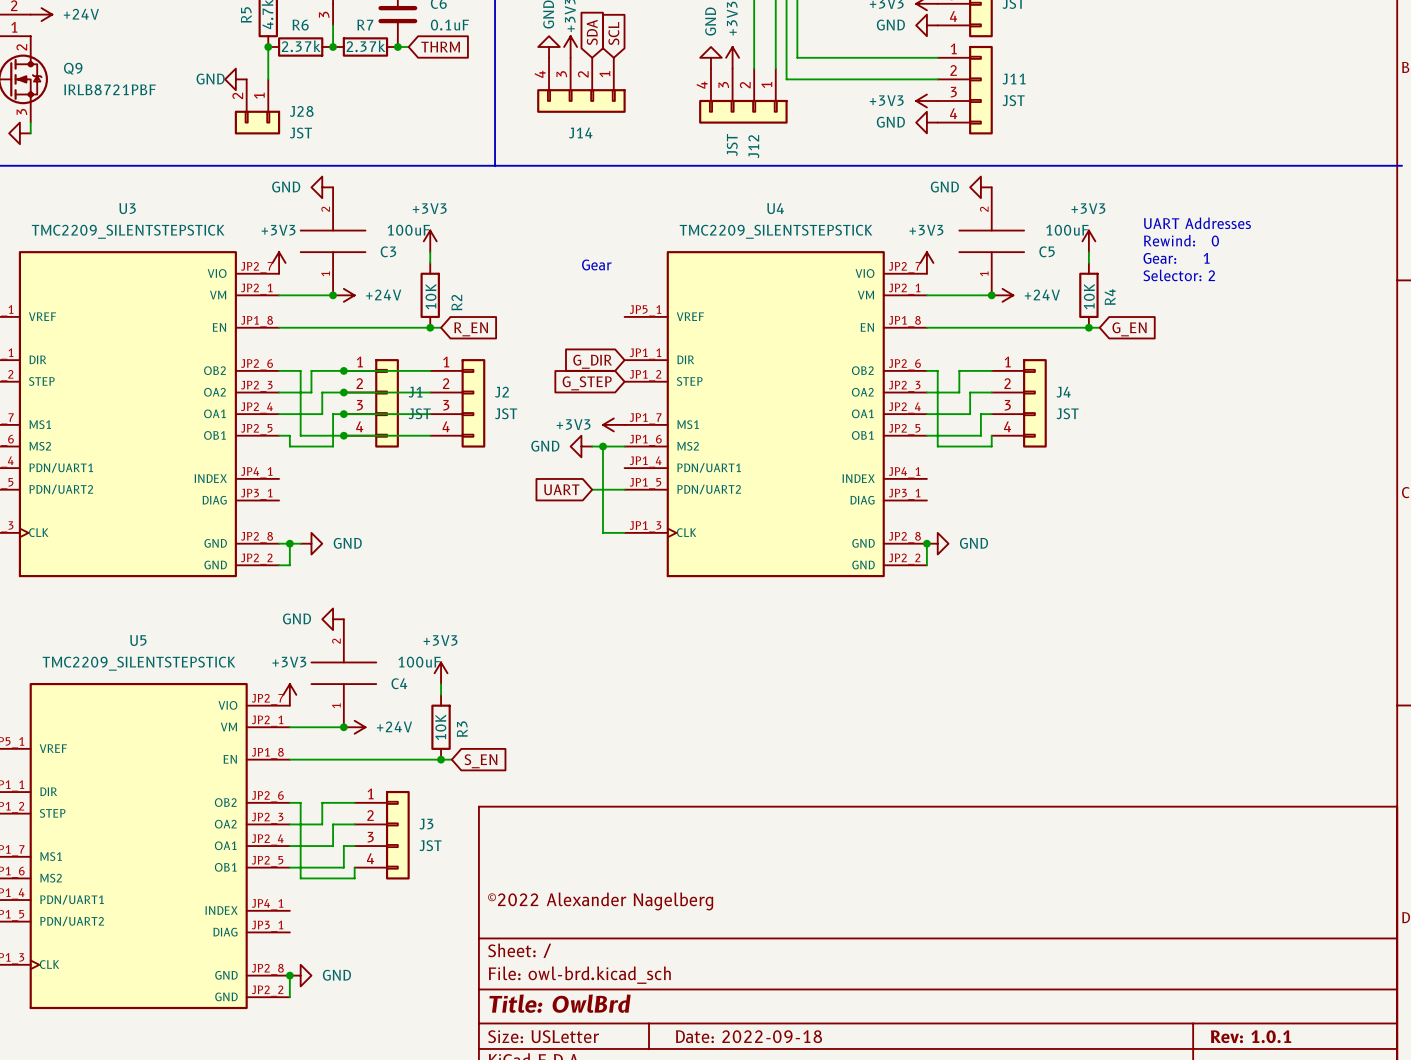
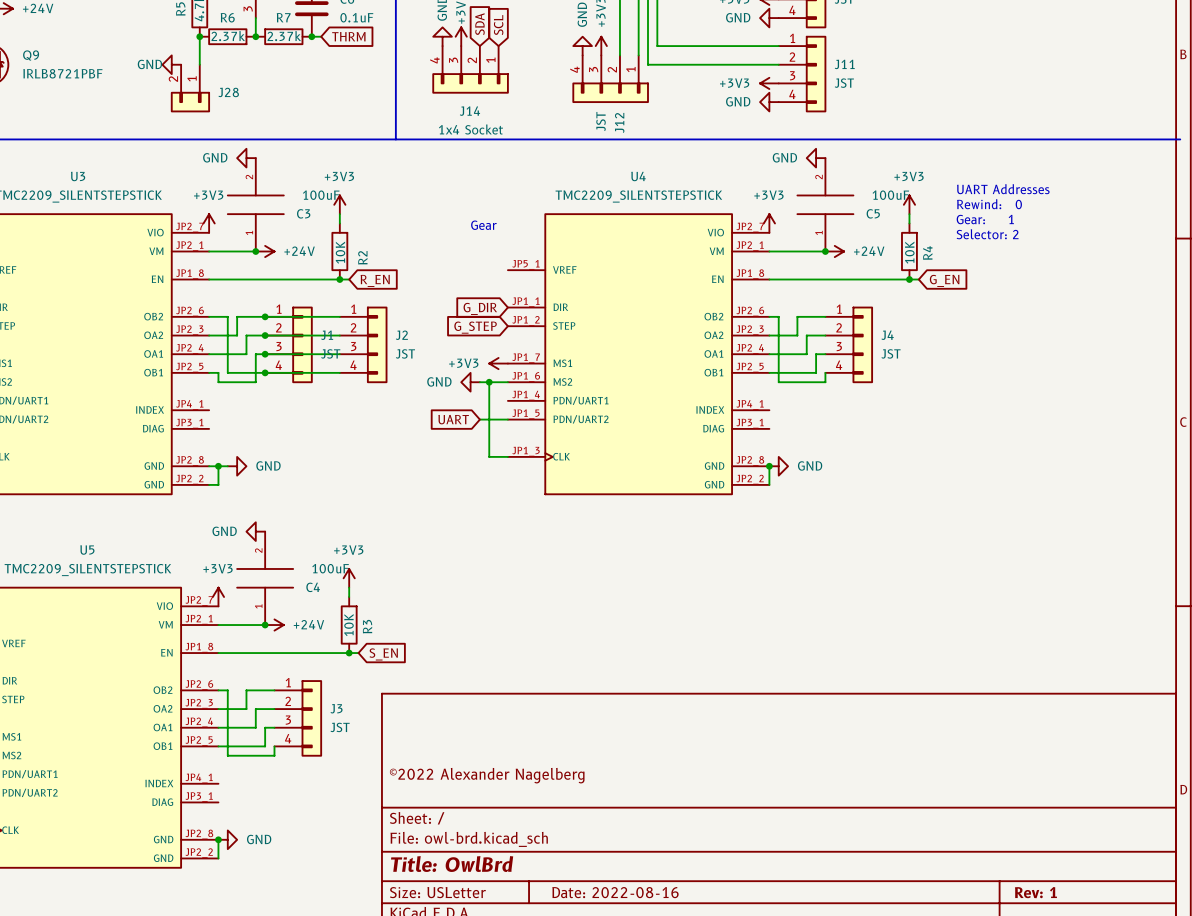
J28 value: JST (300, 133) -> none
J14 value: none -> 1x4 Socket (470, 129)
title block: Date: 2022-09-18 (748, 1036) -> Date: 2022-08-16 (615, 892)
title block: Rev: 1.0.1 (1251, 1036) -> Rev: 1 (1035, 892)

